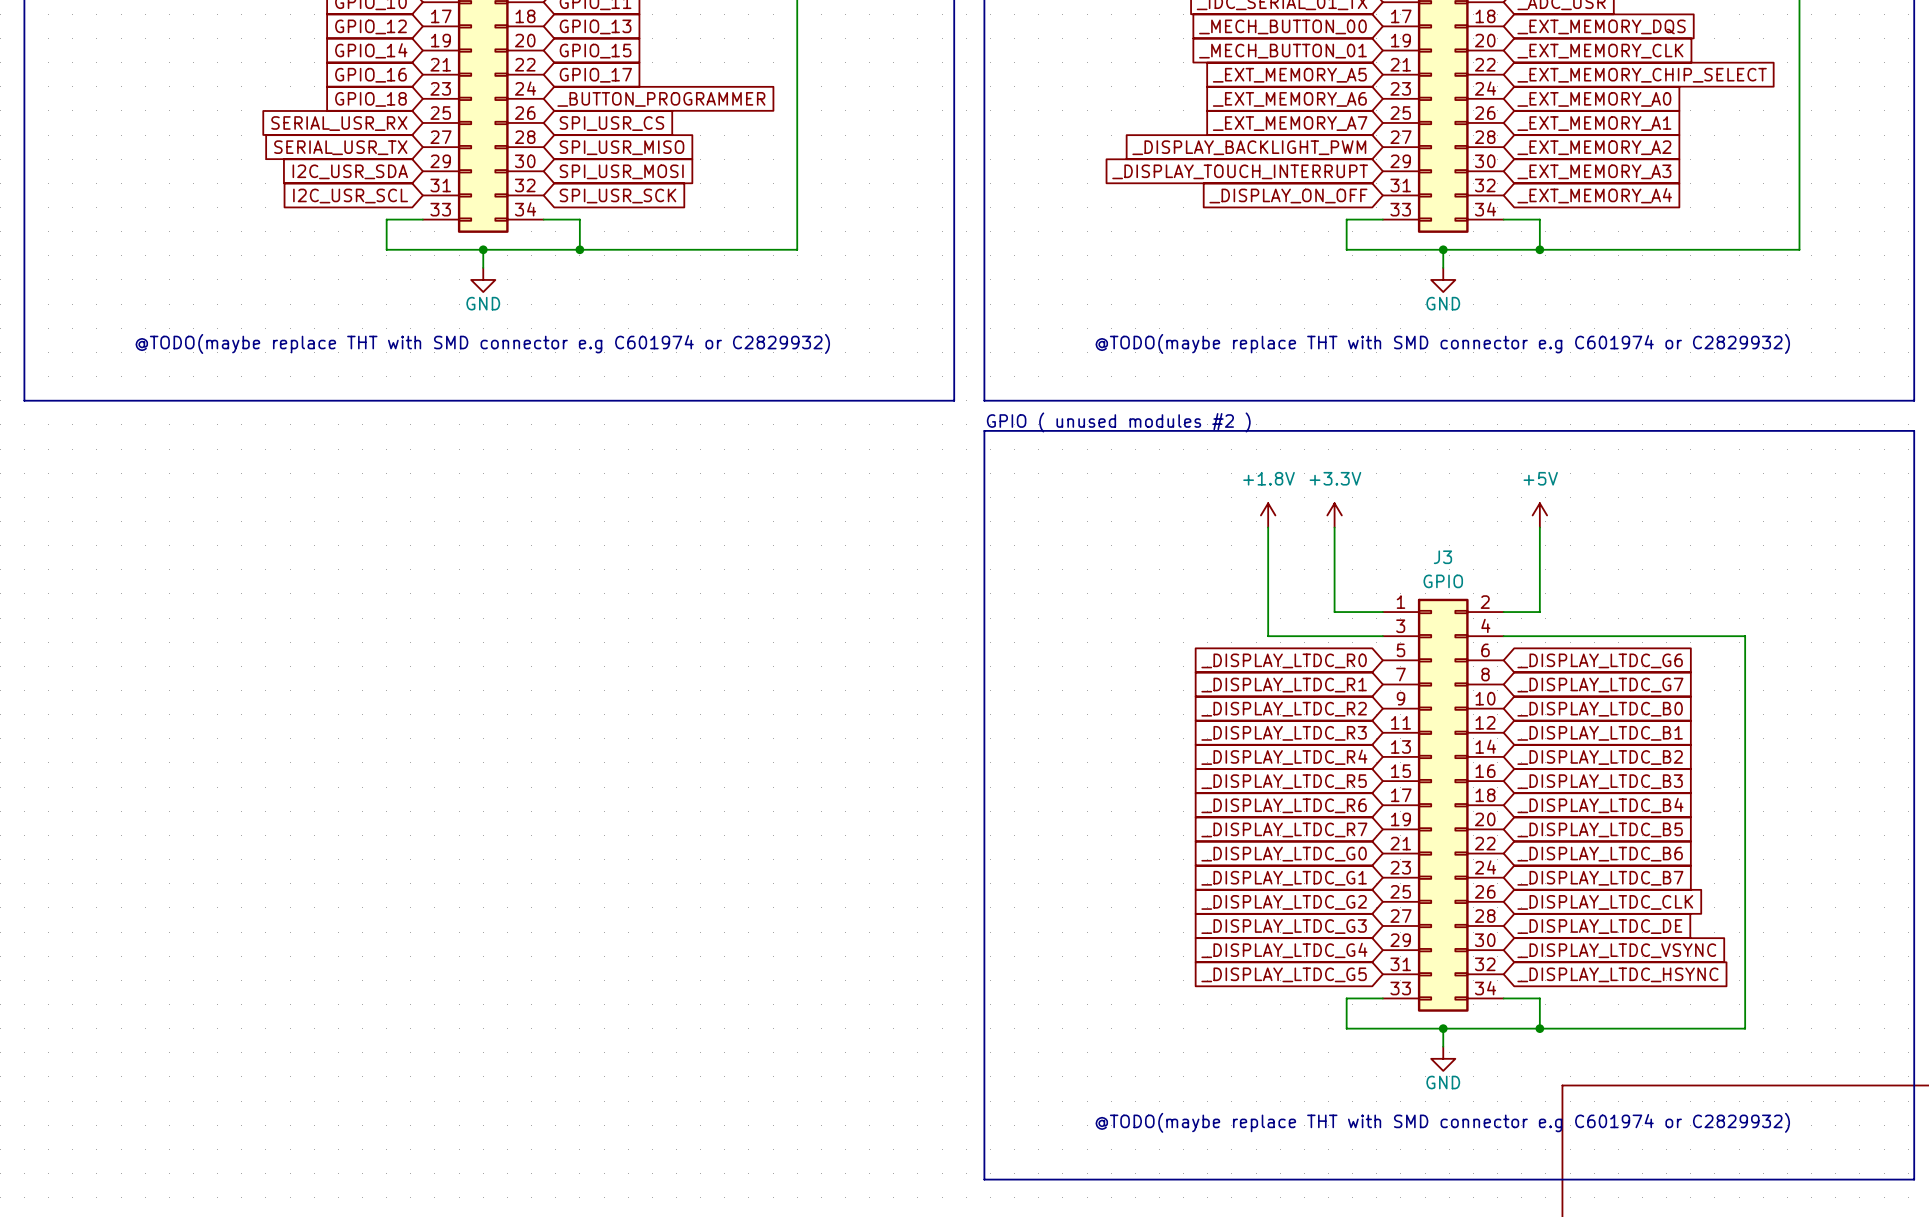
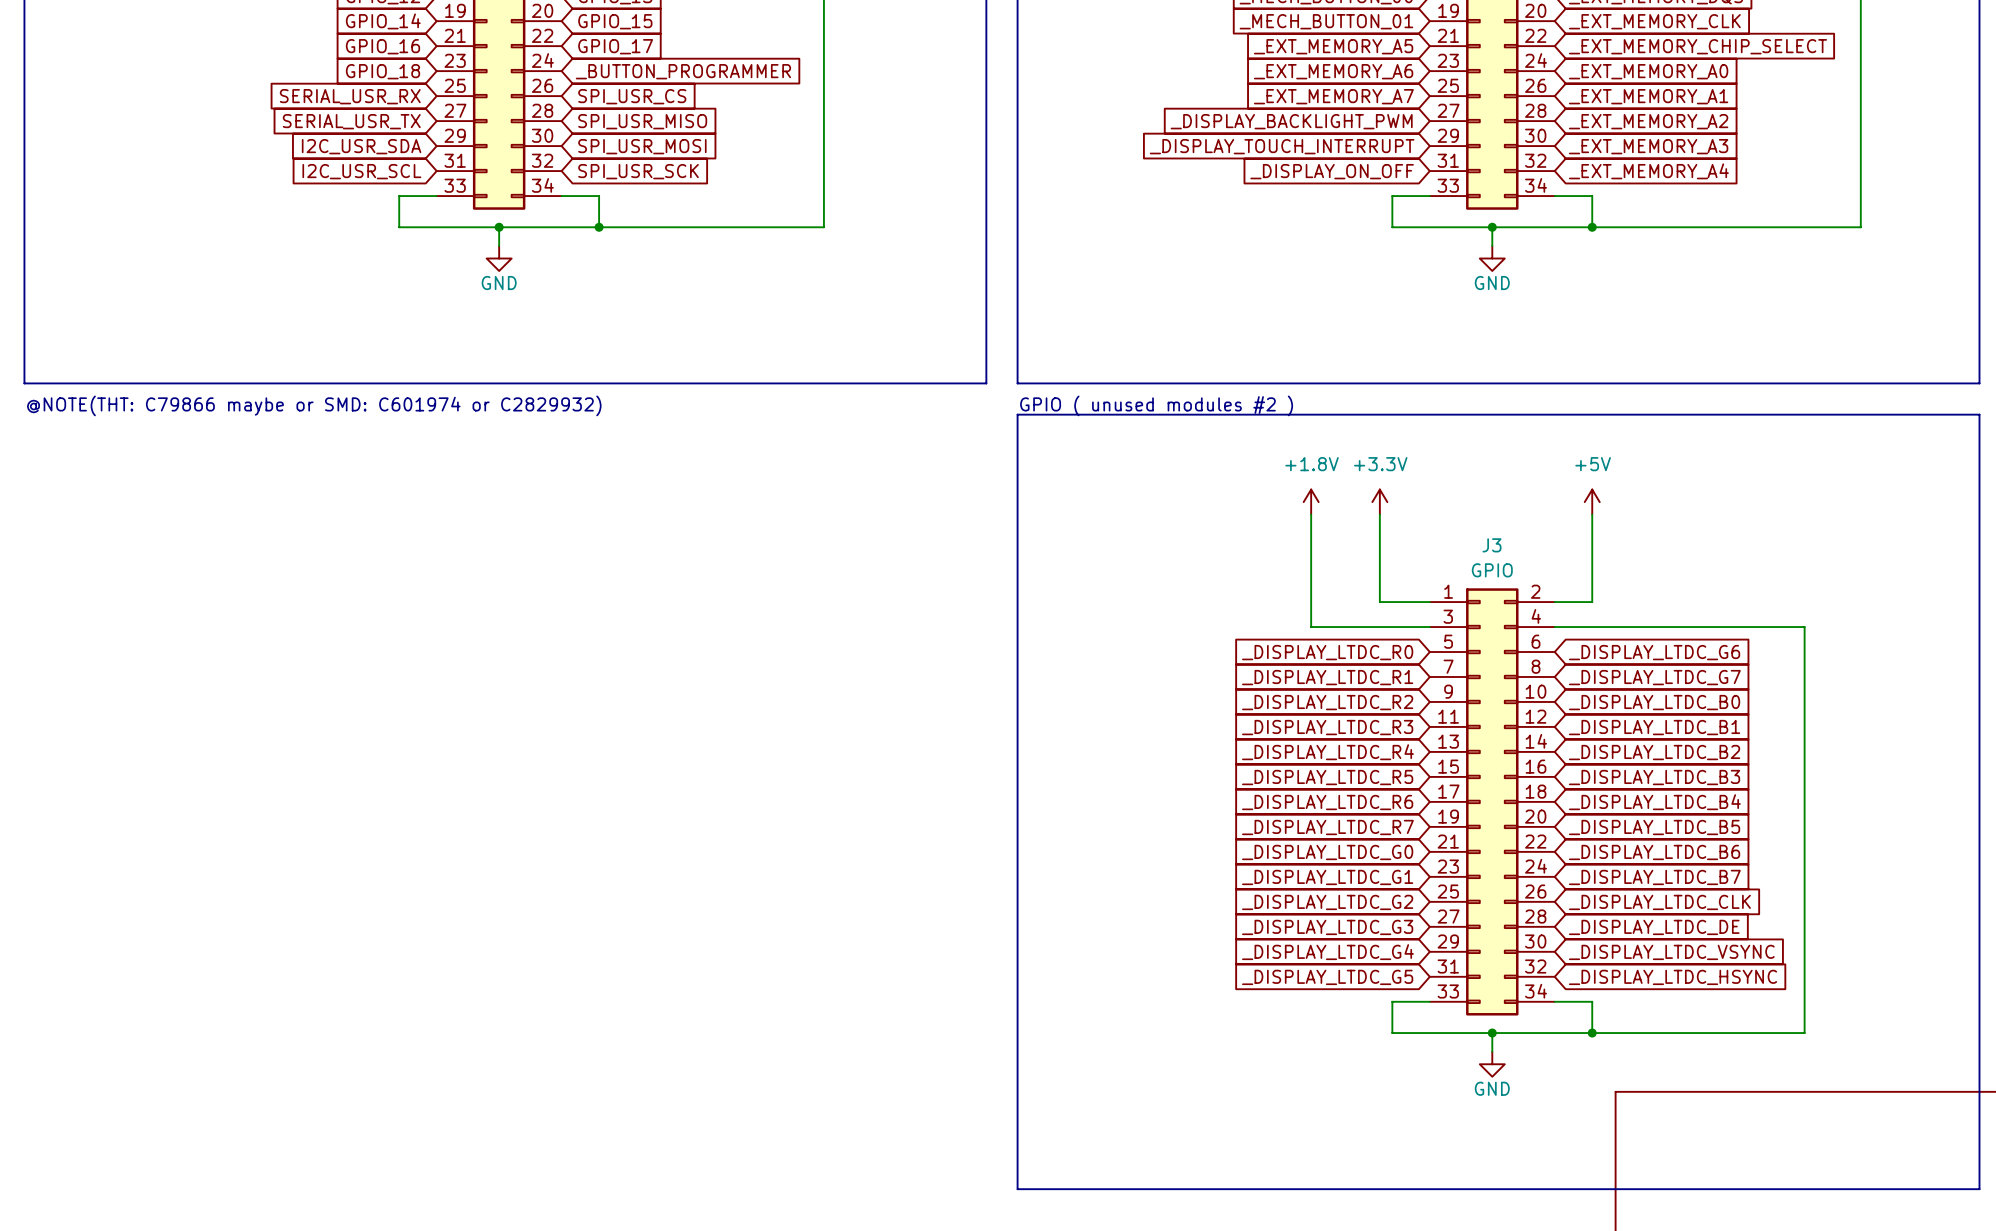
text: @TODO(maybe replace THT with SMD connector e.g C601974 or C2829932) (482, 343) -> none
text: @TODO(maybe replace THT with SMD connector e.g C601974 or C2829932) (1442, 343) -> none
text: none -> @NOTE(THT: C79866 maybe or SMD: C601974 or C2829932) (314, 405)
text: @TODO(maybe replace THT with SMD connector e.g C601974 or C2829932) (1442, 1122) -> none

